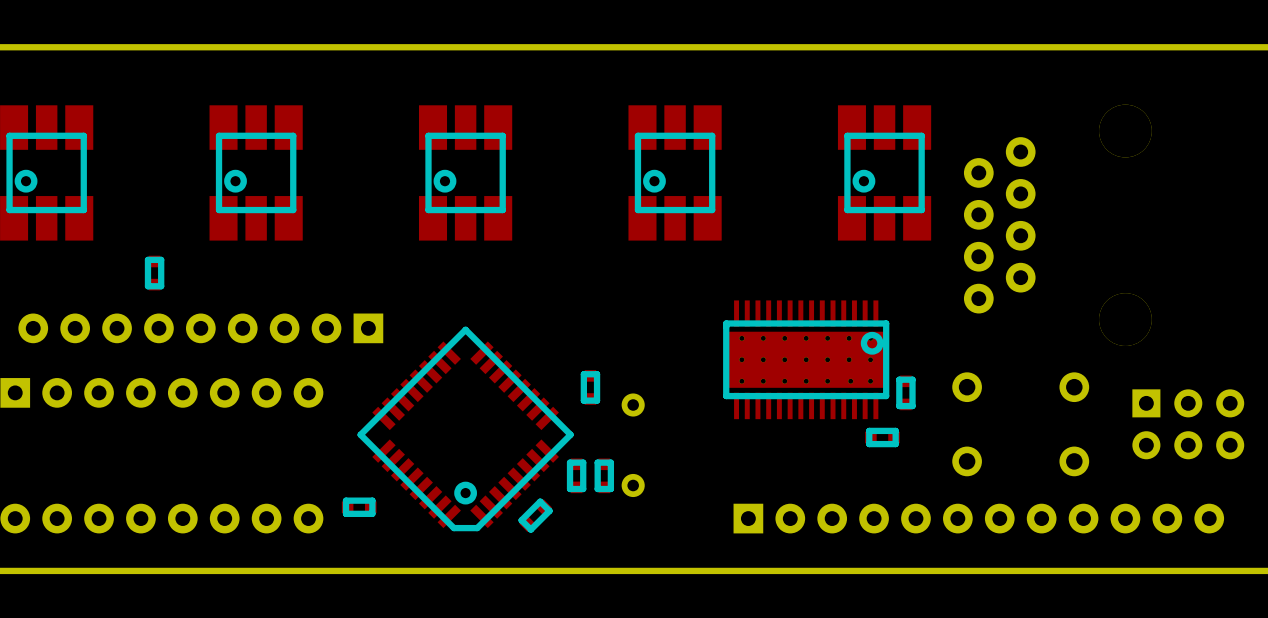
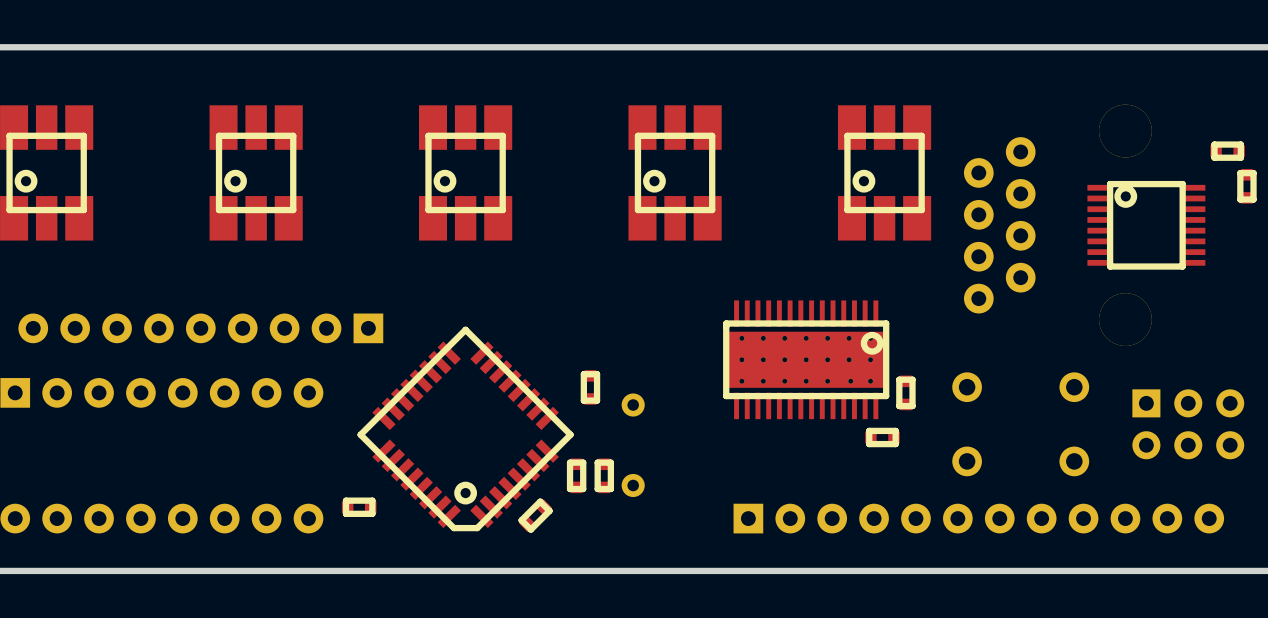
part: none -> (1227, 151)
part: none -> (1246, 186)
part: none -> (1146, 225)
part: (154, 273) -> none

